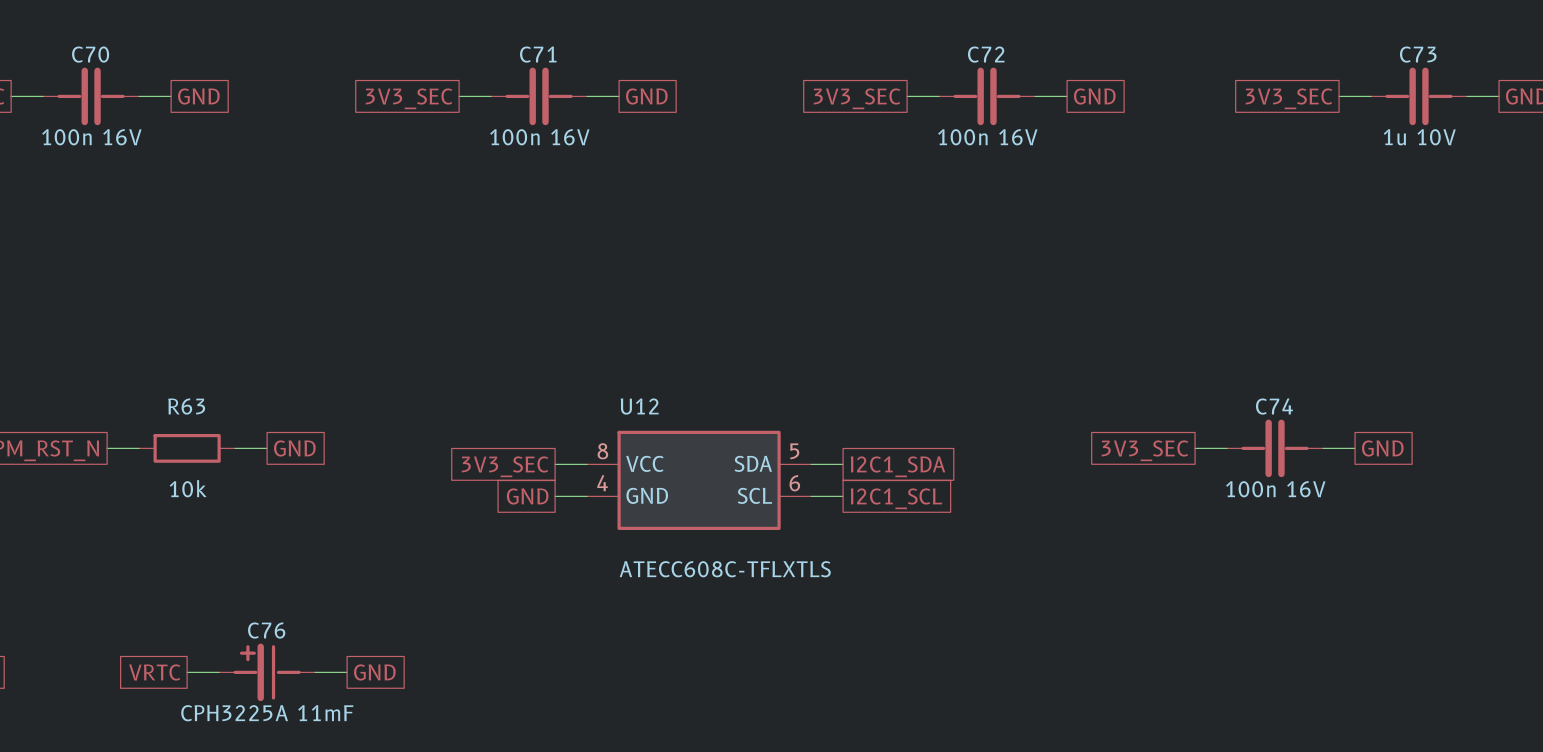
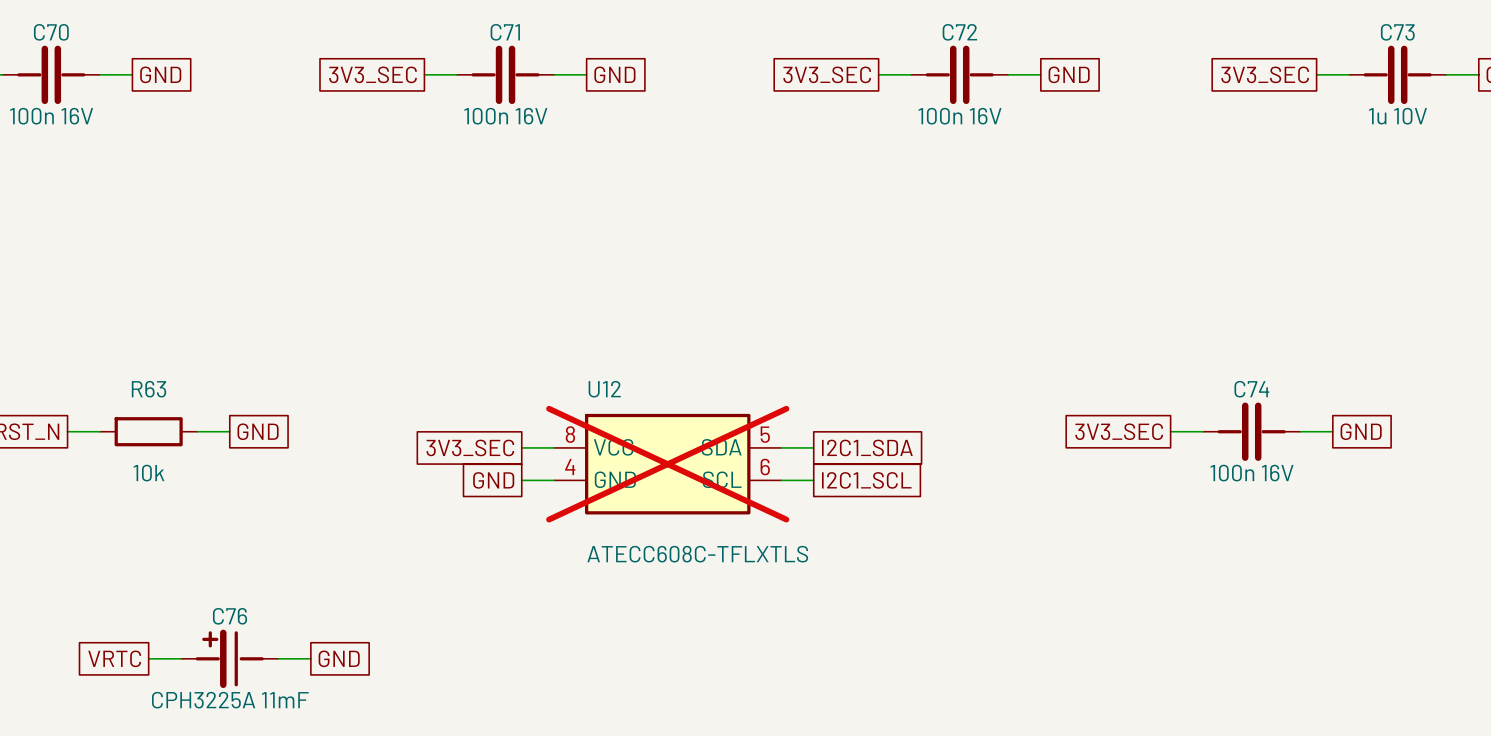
U12 do-not-place cross: none -> (667, 464)

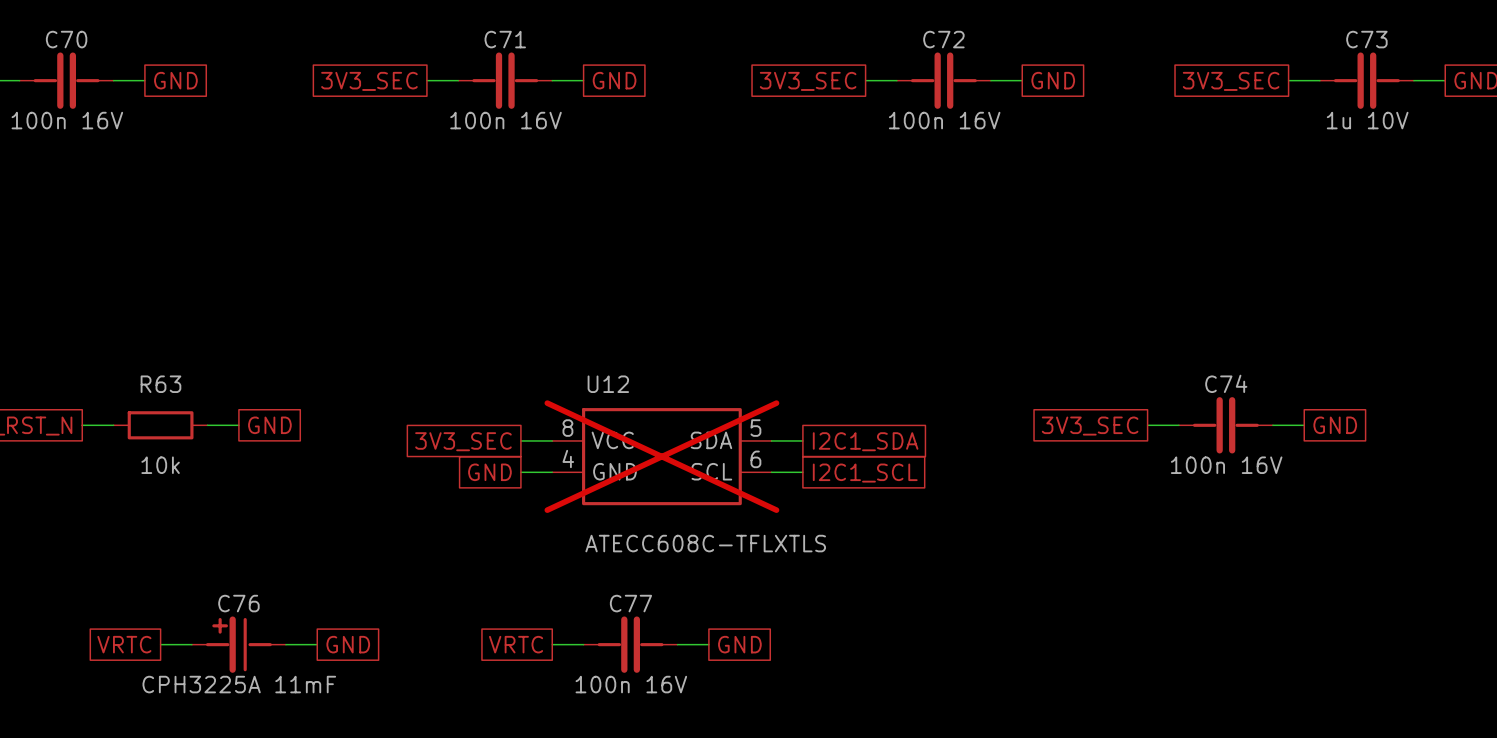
global label: none -> VRTC (516, 644)
wire: none -> (552, 644) (583, 644)
C77: none -> 100n 16V (630, 644)
wire: none -> (677, 644) (708, 644)
global label: none -> GND (739, 644)

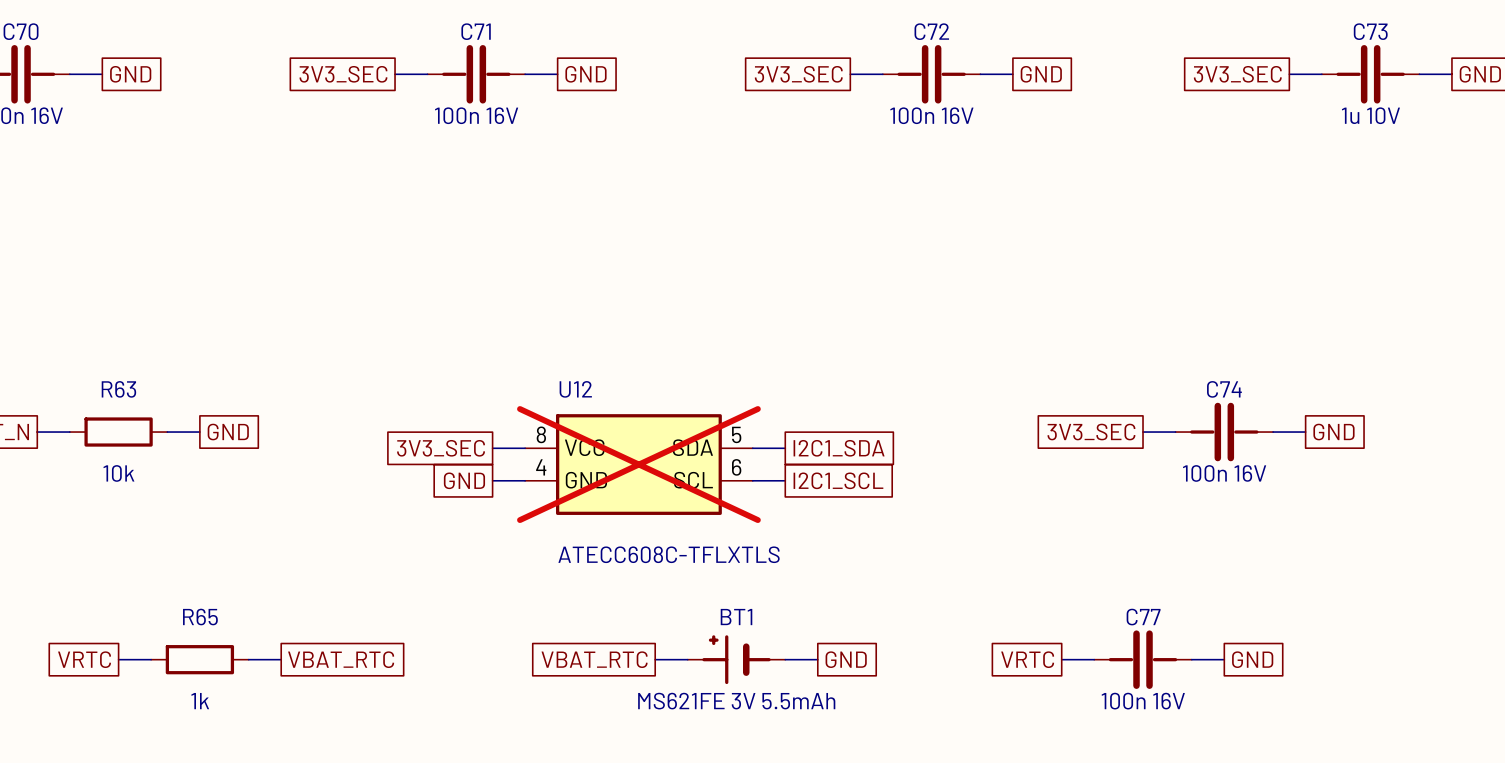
C76: CPH3225A 11mF (238, 644) -> none
R65: none -> 1k (199, 659)
global label: GND (348, 644) -> VBAT_RTC (341, 659)
global label: VRTC (516, 644) -> VBAT_RTC (594, 659)
wire: (552, 644) (583, 644) -> (785, 659) (817, 659)
C77 position: (630, 644) -> (1143, 659)
global label position: GND (739, 644) -> GND (846, 659)
BT1: none -> MS621FE 3V 5.5mAh (736, 659)
global label: none -> VRTC (1027, 659)
wire: none -> (1061, 659) (1094, 659)
wire: none -> (1191, 659) (1224, 659)
global label: none -> GND (1252, 659)

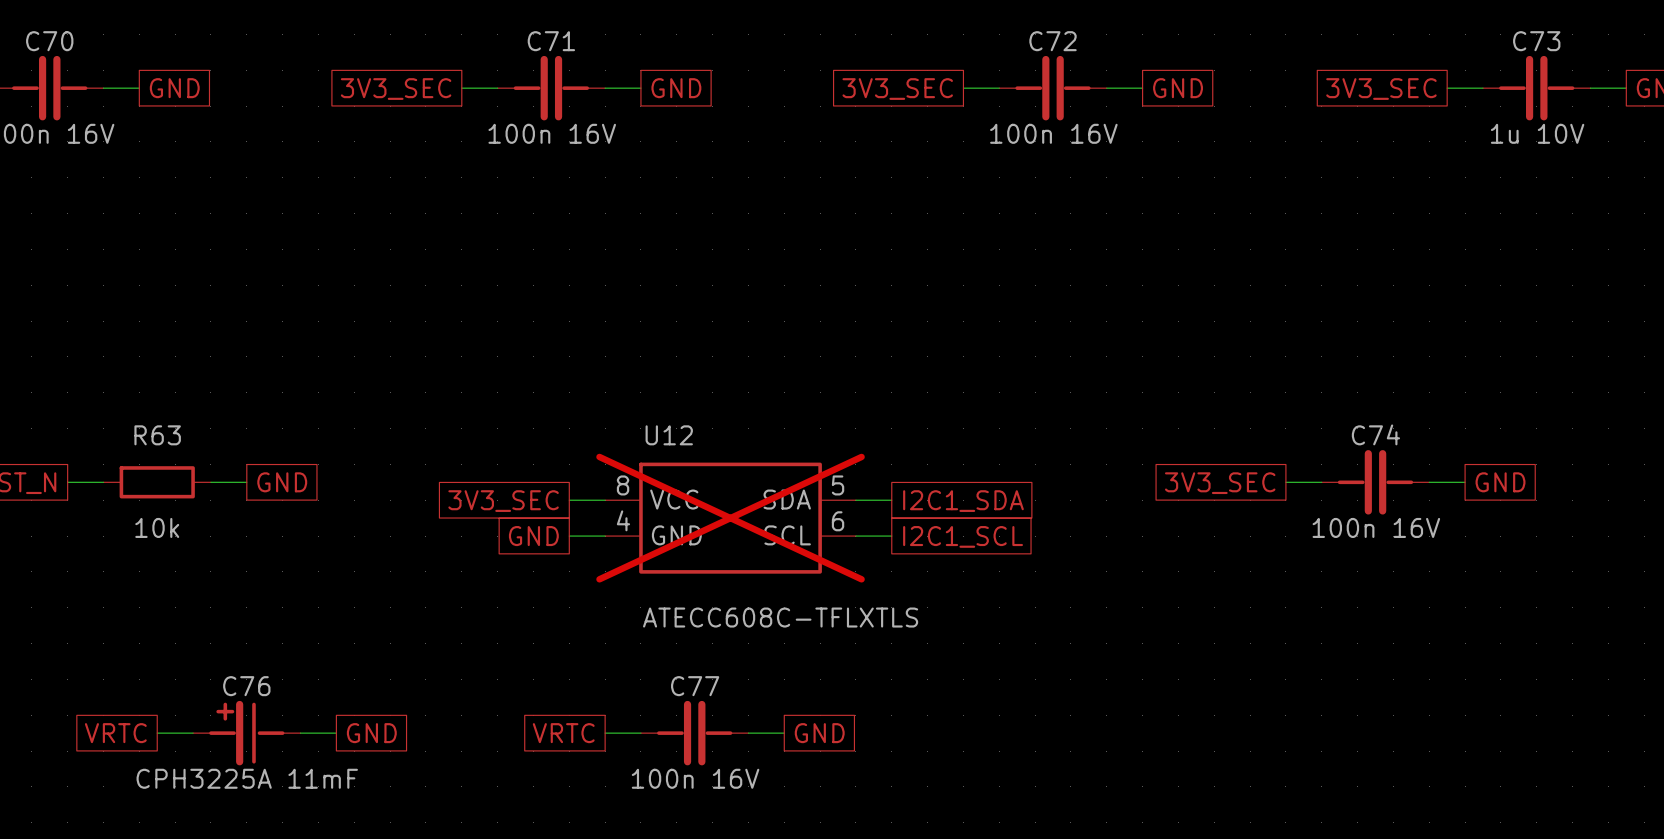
R65: 1k (199, 659) -> none
C76: none -> CPH3225A 11mF (246, 733)
global label: VBAT_RTC (341, 659) -> GND (371, 733)
global label: VBAT_RTC (594, 659) -> VRTC (563, 733)
BT1: MS621FE 3V 5.5mAh (736, 659) -> none
wire: (785, 659) (817, 659) -> (605, 733) (640, 733)
global label position: GND (846, 659) -> GND (819, 733)
global label: VRTC (1027, 659) -> none
wire: (1061, 659) (1094, 659) -> none
C77 position: (1143, 659) -> (694, 733)
wire: (1191, 659) (1224, 659) -> none
global label: GND (1252, 659) -> none

